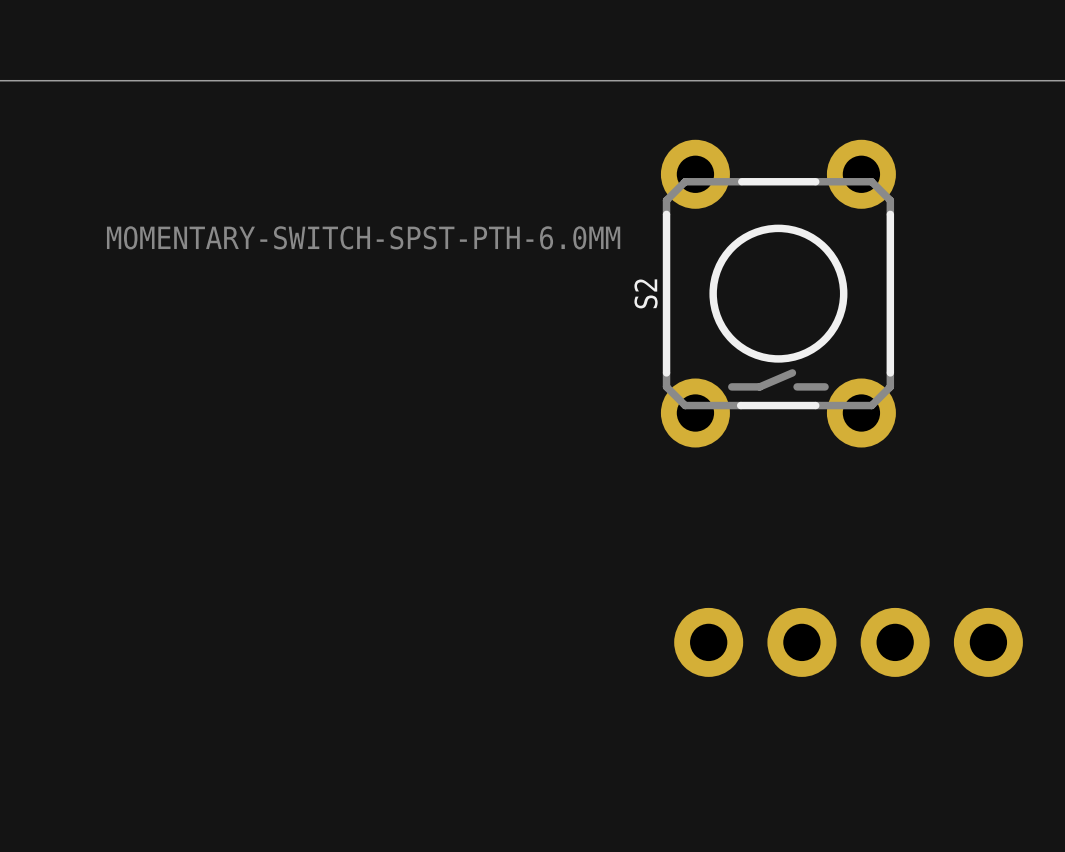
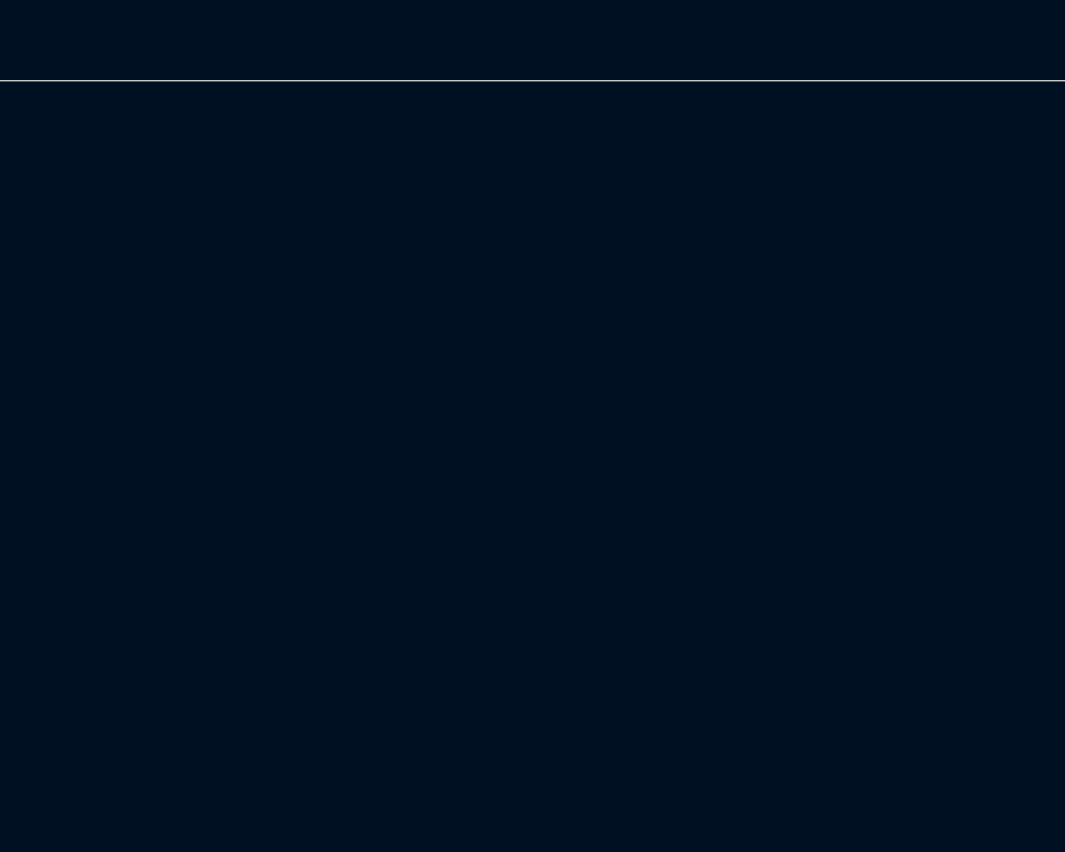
S2: MOMENTARY-SWITCH-SPST-PTH-6.0MM (778, 293) -> none
part: (848, 642) -> none

